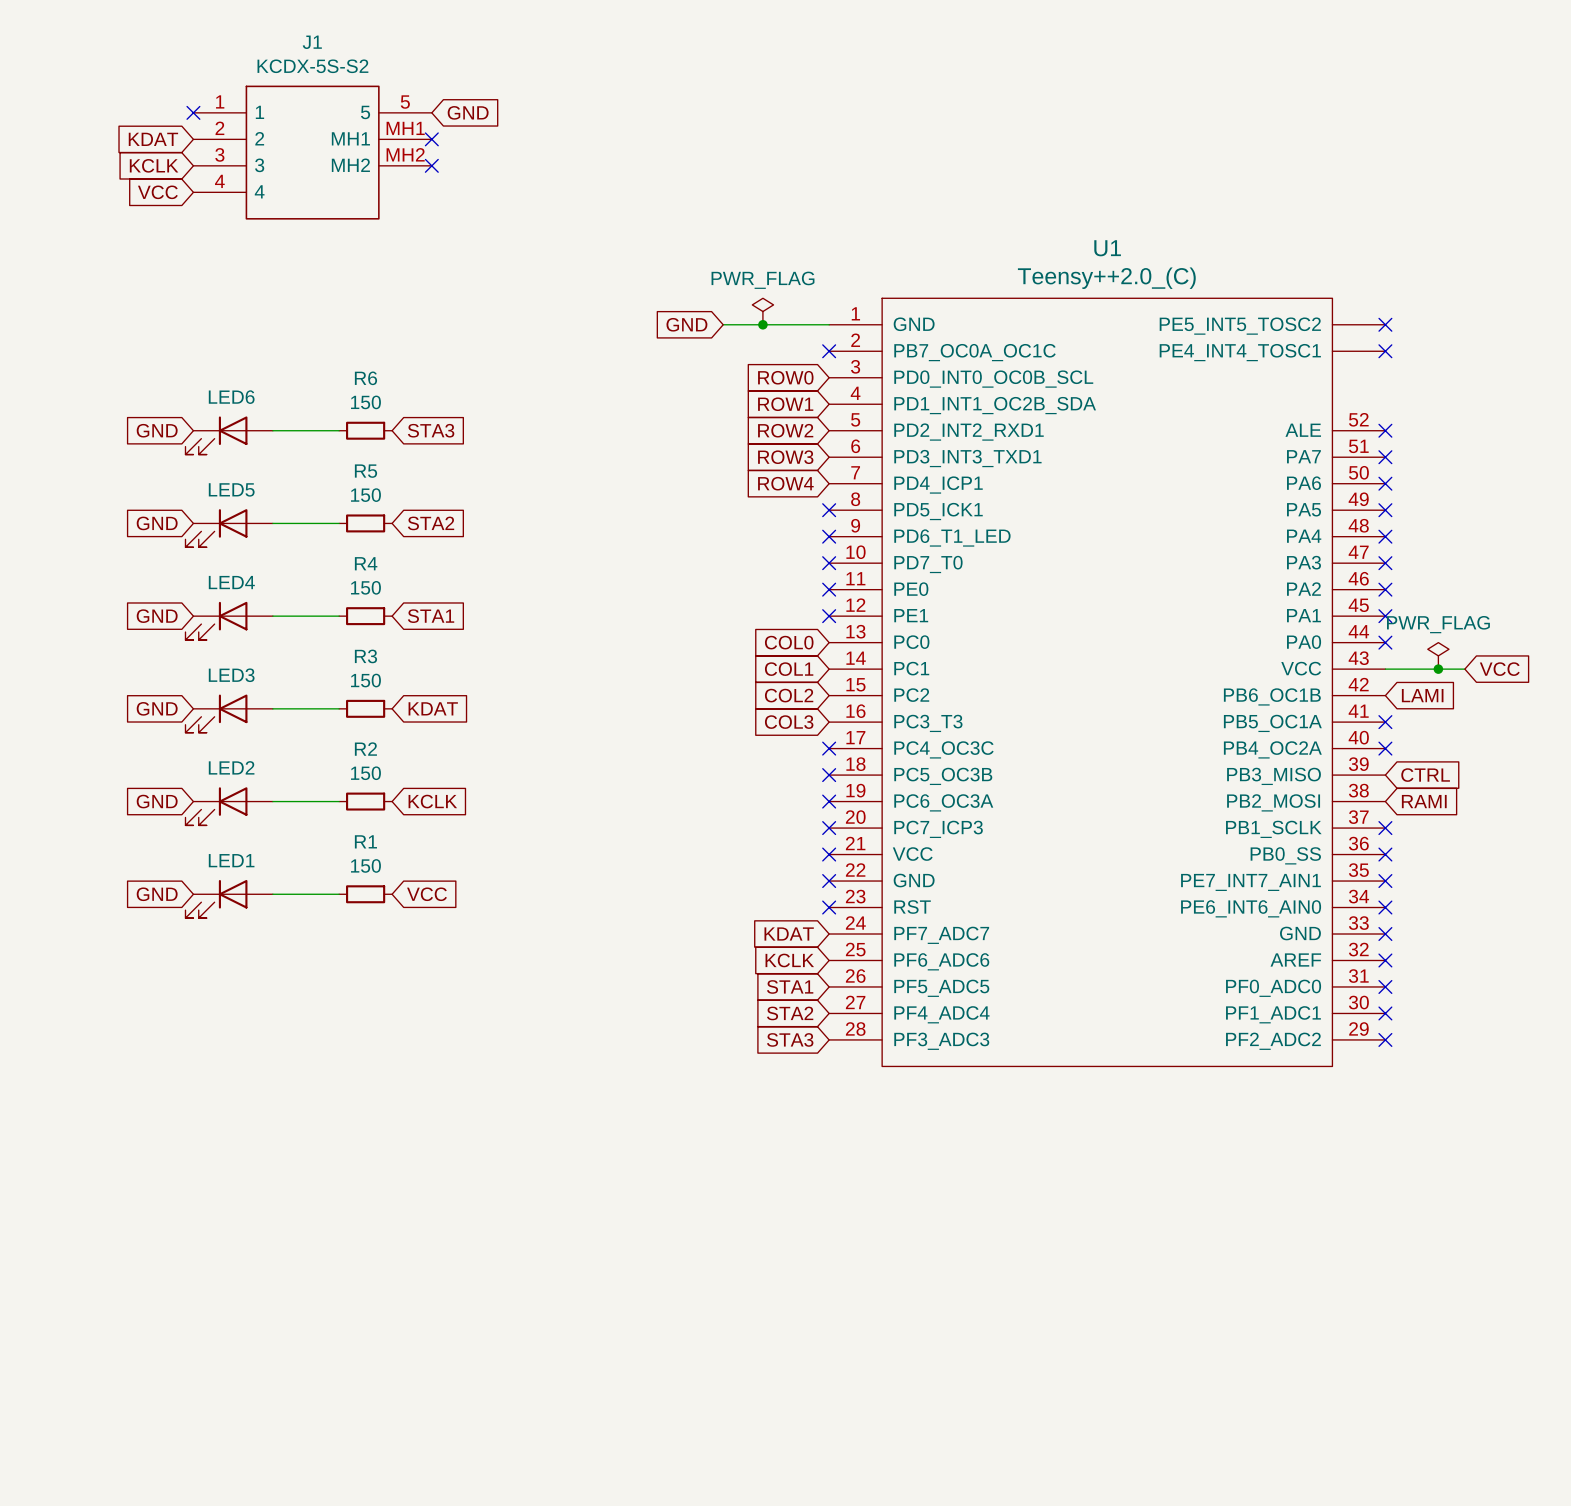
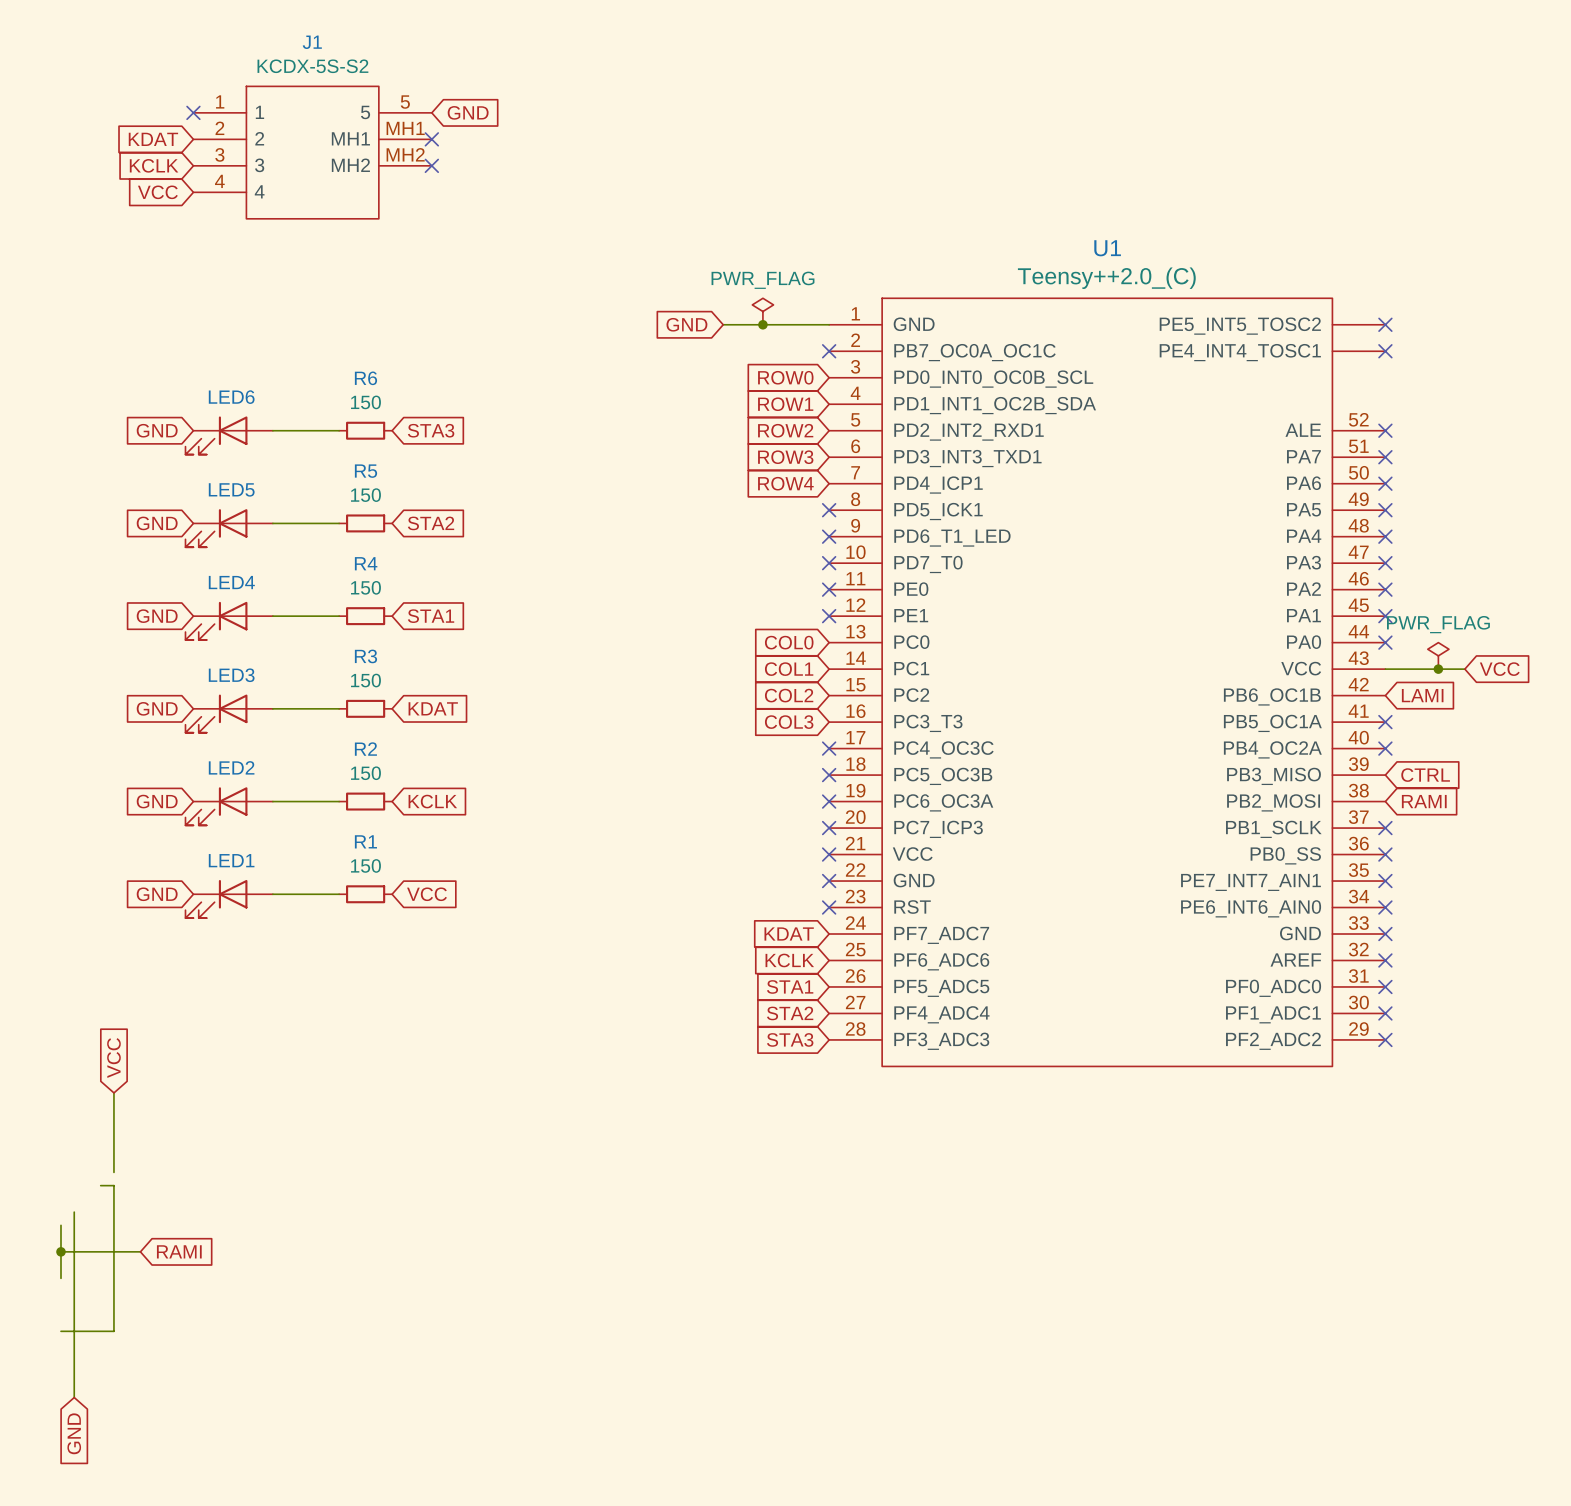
global label: none -> VCC (113, 1058)
wire: none -> (113, 1092) (113, 1172)
wire: none -> (100, 1185) (113, 1185) (113, 1331) (60, 1331)
wire: none -> (74, 1212) (74, 1397)
wire: none -> (60, 1225) (60, 1278)
wire: none -> (60, 1251) (140, 1251)
junction: none -> (60, 1251)
global label: none -> RAMI (179, 1251)
global label: none -> GND (74, 1433)

